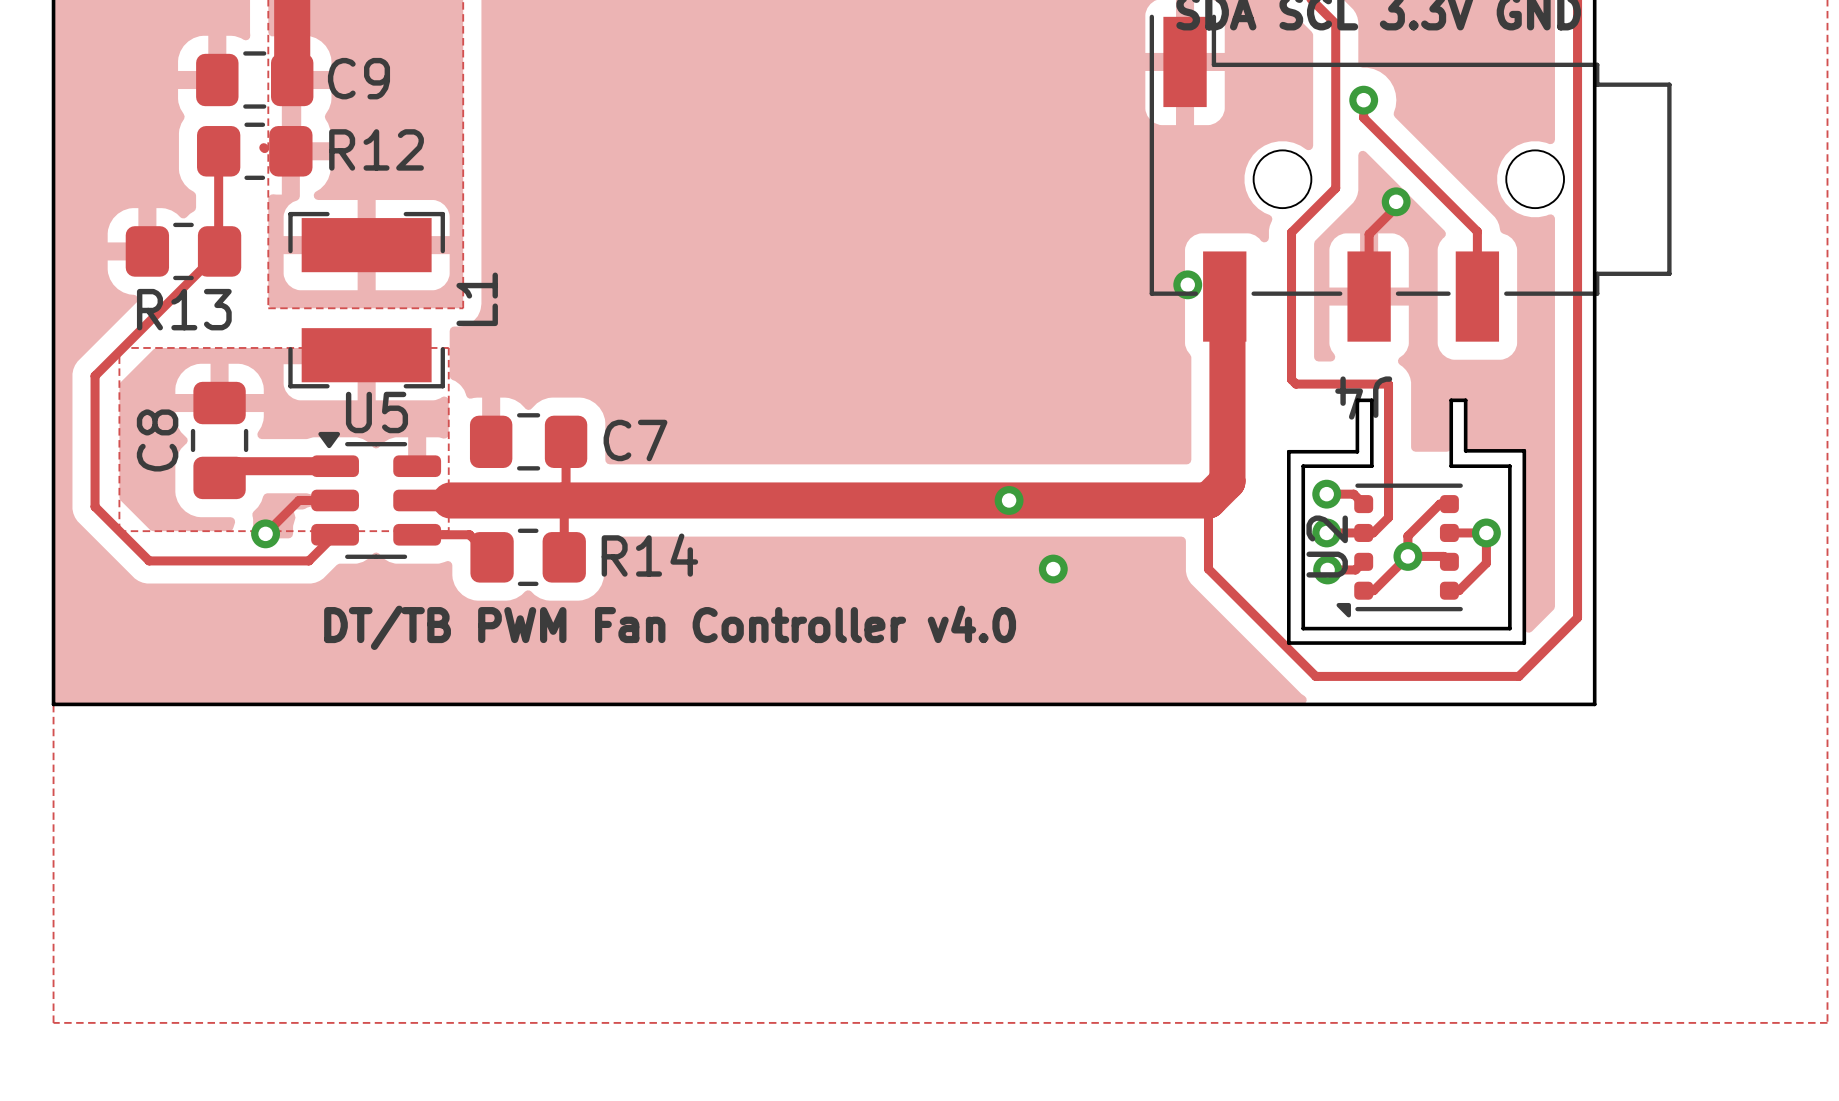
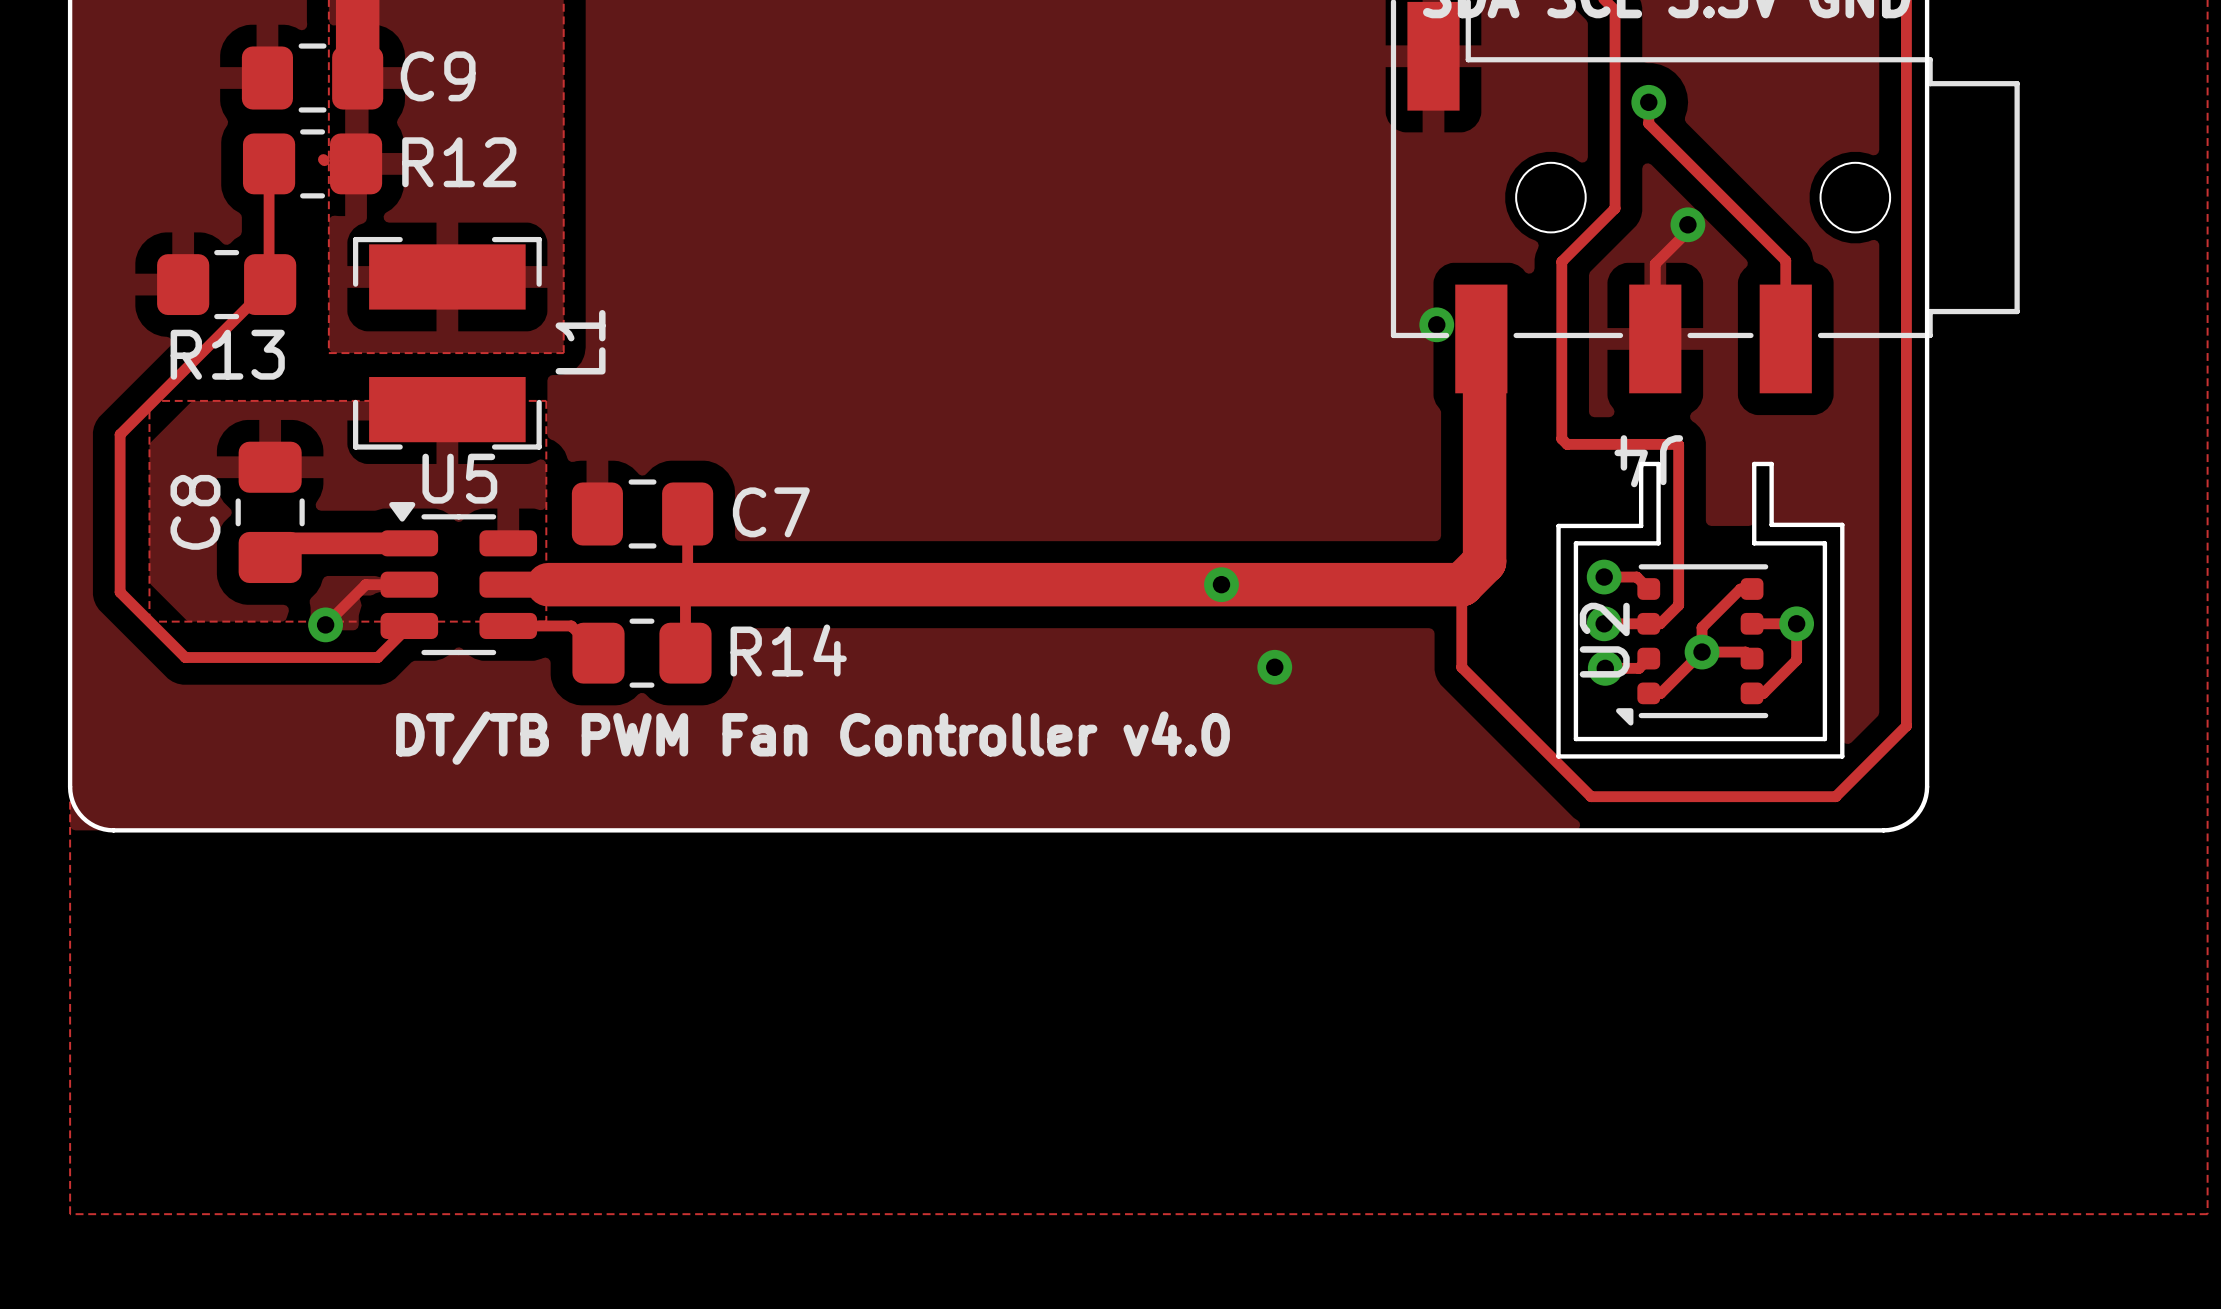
board edge: (53, 668) (53, 704) (89, 704) -> (70, 786) (74, 805) (82, 817) (99, 827) (113, 830)
board edge: (1594, 668) (1594, 704) (1558, 704) -> (1927, 786) (1922, 805) (1914, 817) (1897, 827) (1883, 830)

